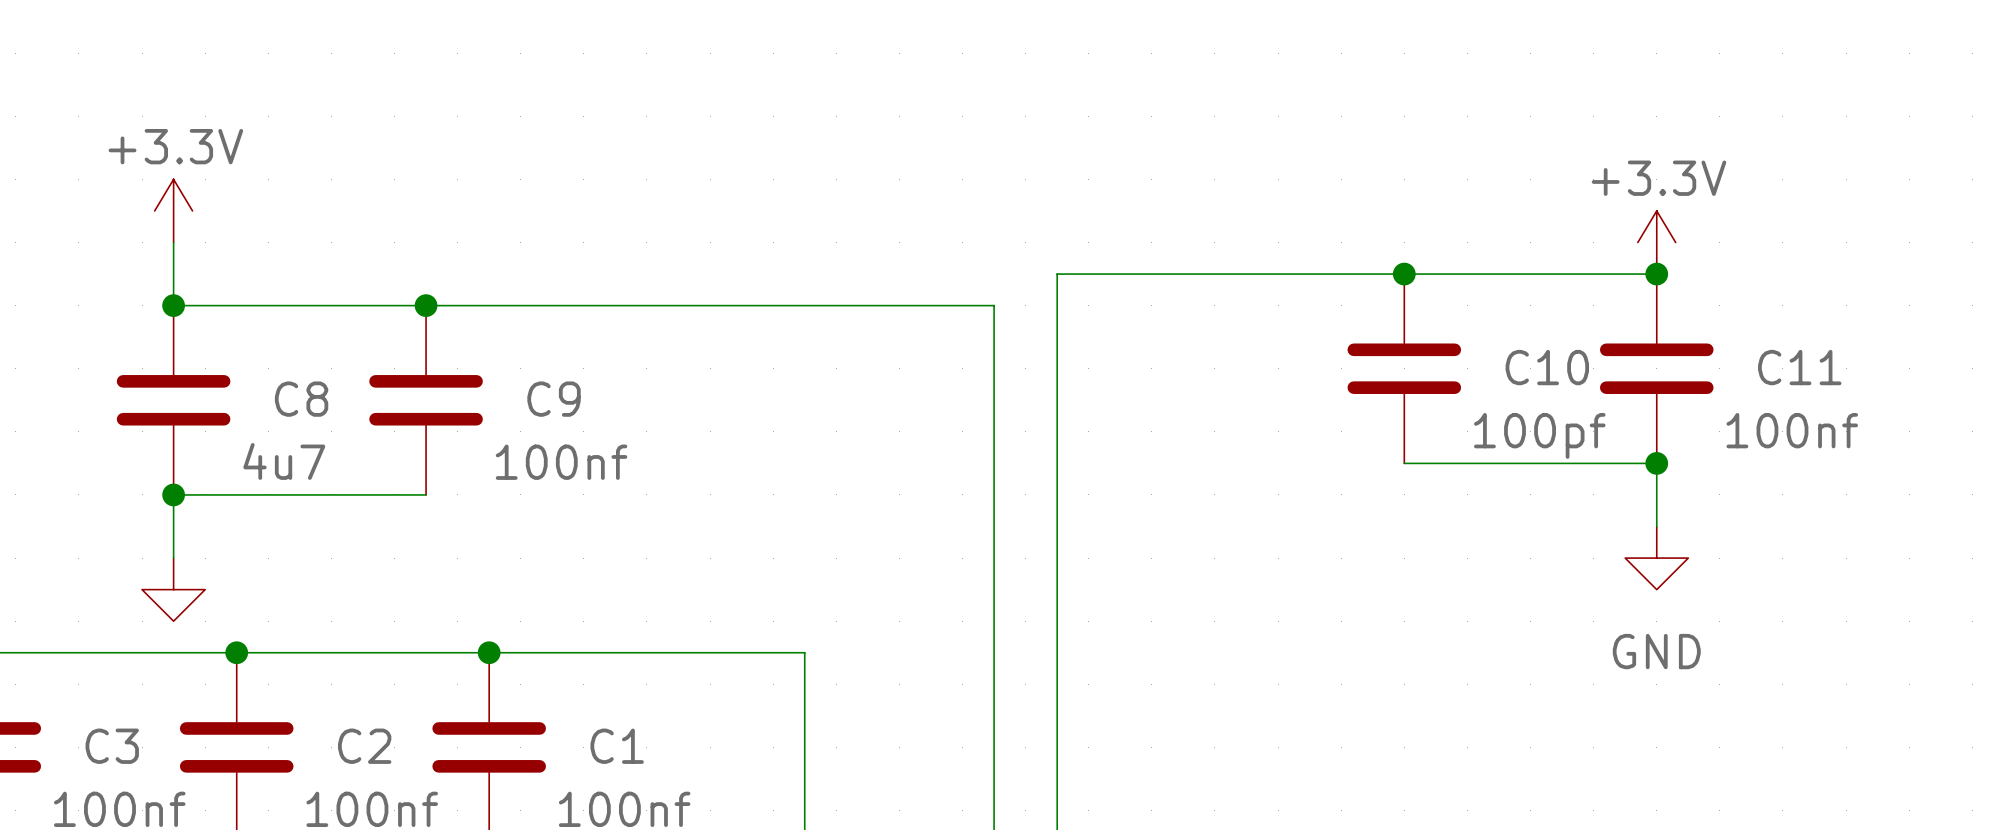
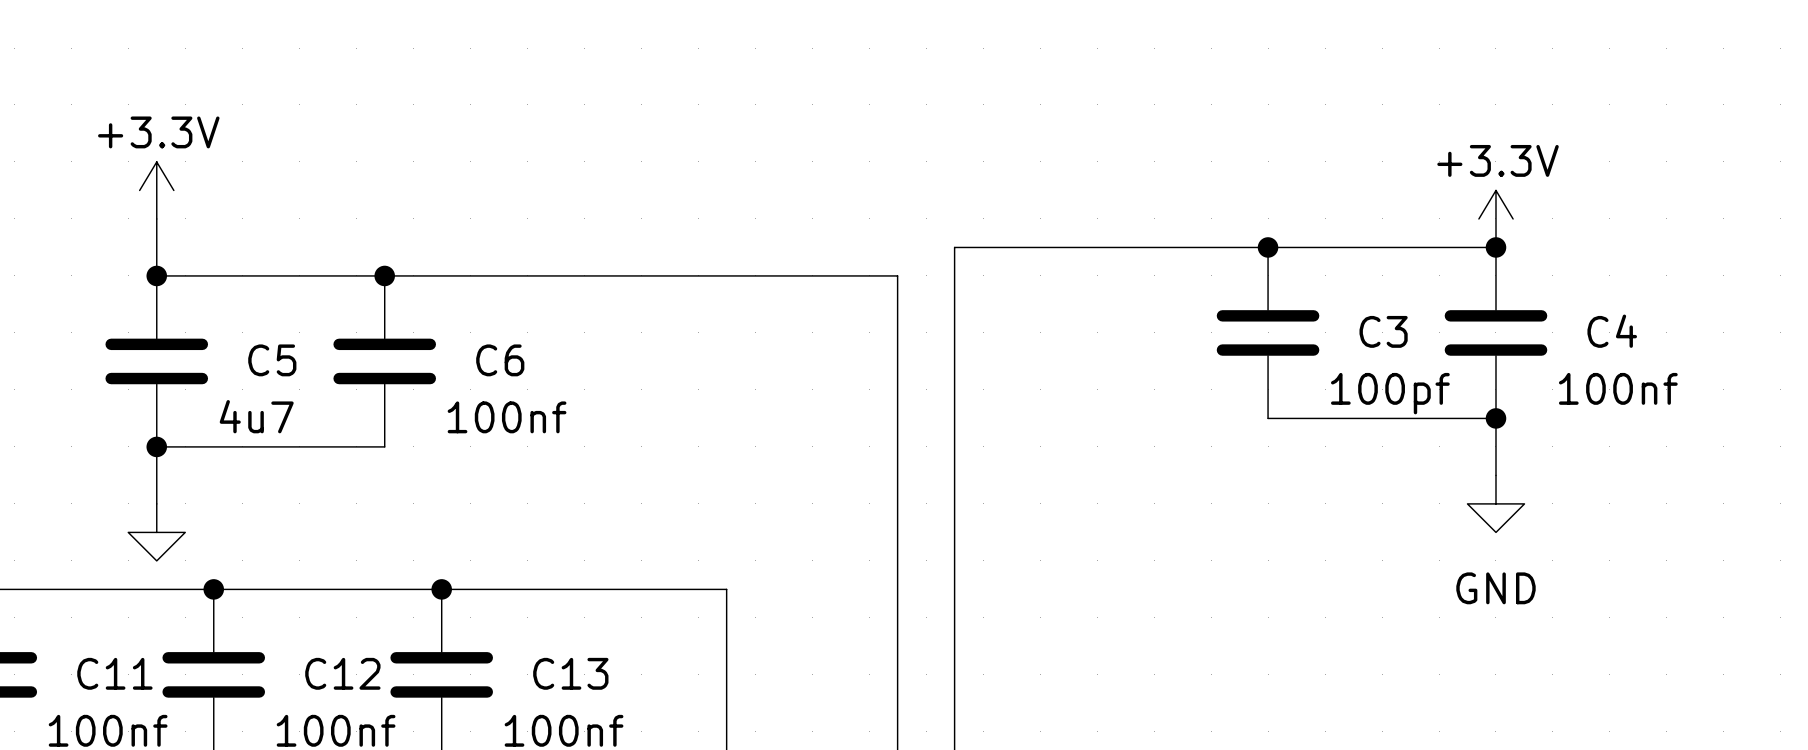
C10 name: C10 (1547, 367) -> C3 (1383, 331)
C11 name: C11 (1799, 367) -> C4 (1612, 331)
C8 name: C8 (301, 399) -> C5 (272, 360)
C9 name: C9 (554, 399) -> C6 (500, 360)
C3 name: C3 (112, 746) -> C11 (114, 673)
C2 name: C2 (364, 746) -> C12 (342, 673)
C1 name: C1 (617, 746) -> C13 (570, 673)

